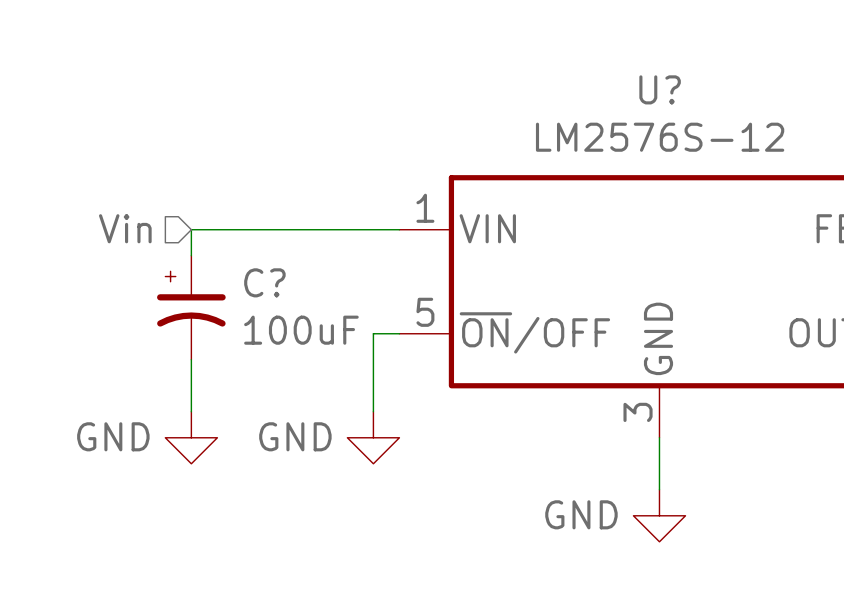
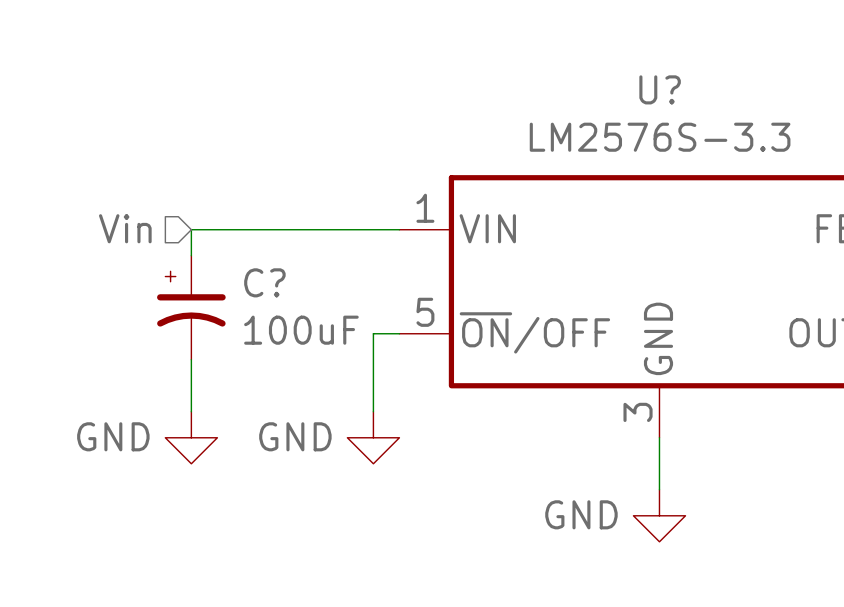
U? value: LM2576S-12 (660, 137) -> LM2576S-3.3 (660, 137)

